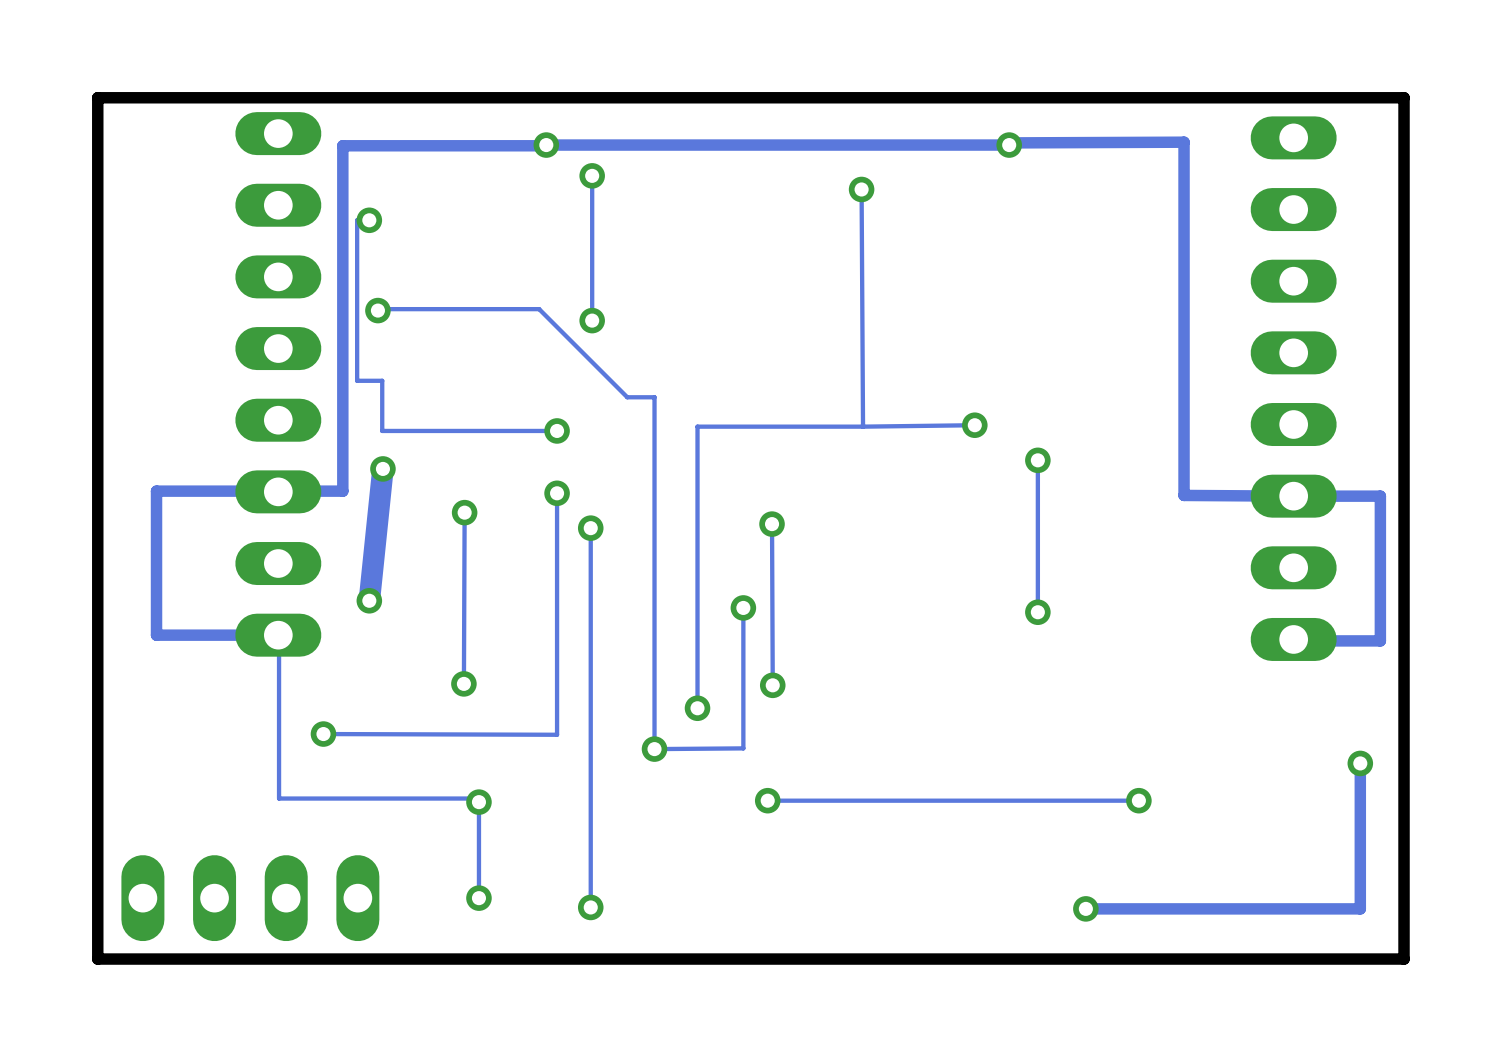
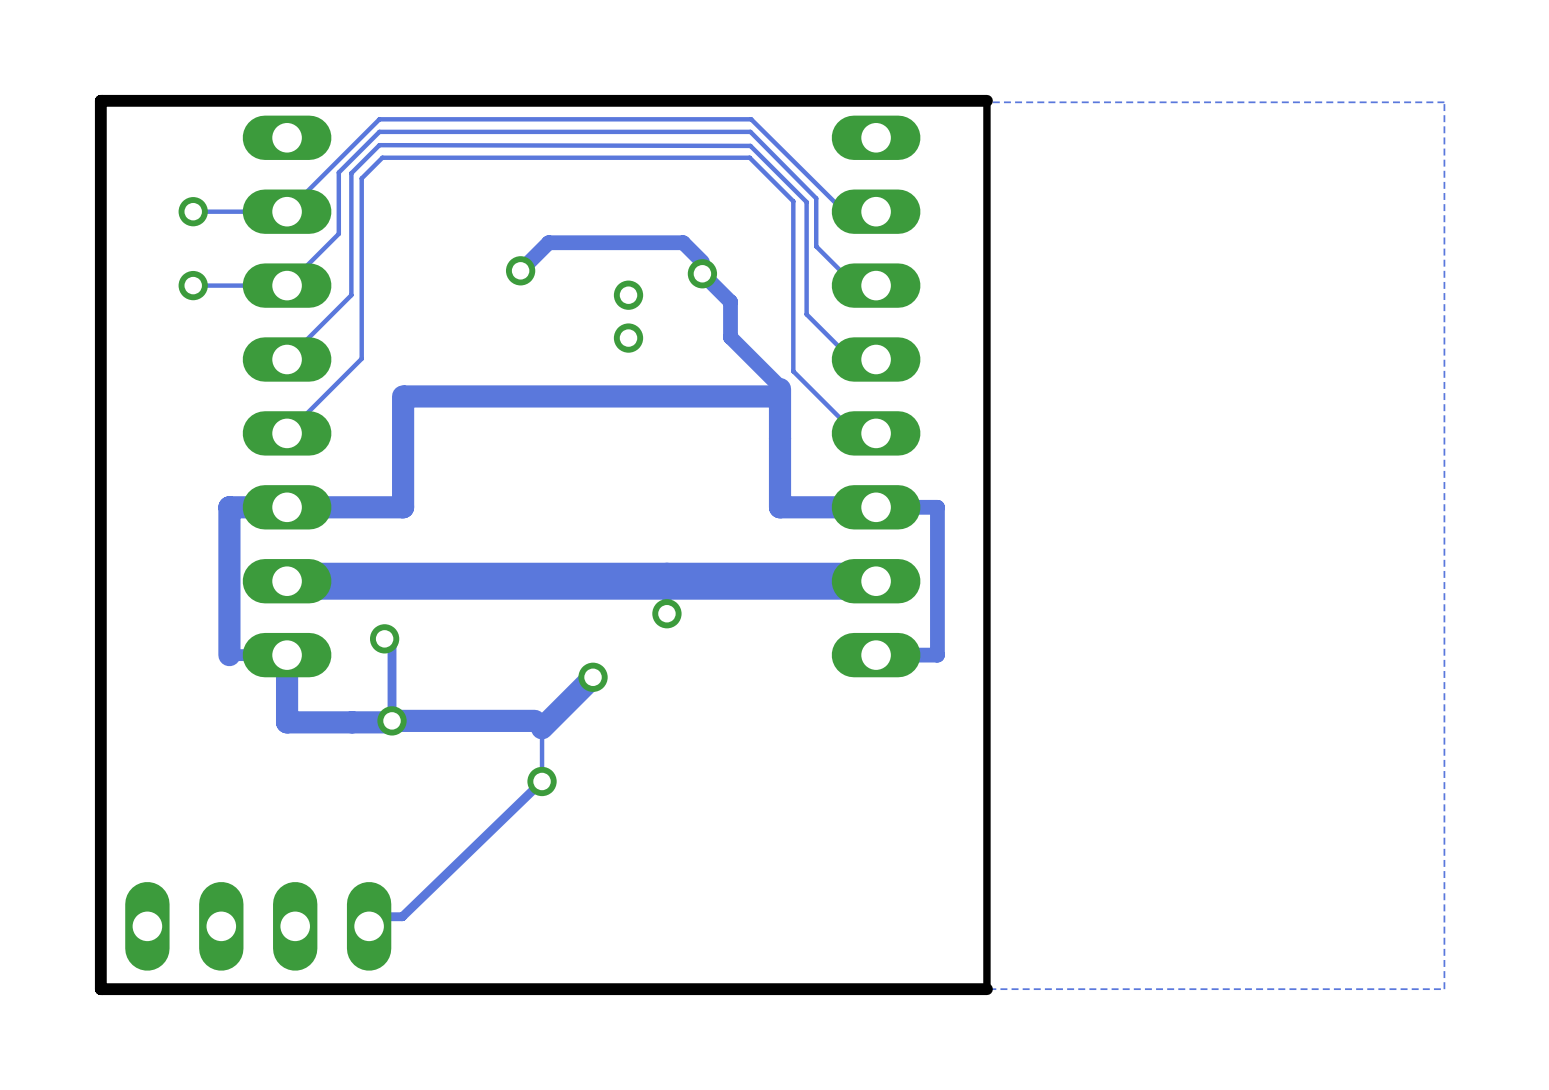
board edge: (956, 97) (1404, 97) (1404, 959) (956, 959) -> (986, 100) (986, 989)
via: (546, 145) -> none
via: (1009, 145) -> none
track: (592, 175) (592, 320) -> none
via: (592, 175) -> none
track: (861, 189) (863, 426) -> none
via: (861, 189) -> none
via: none -> (193, 211)
track: none -> (876, 211) (844, 211) (751, 119) (379, 119) (287, 211) (193, 211)
track: (369, 220) (357, 220) (357, 380) (382, 380) (382, 430) (557, 430) -> none
via: (369, 220) -> none
track: none -> (520, 270) (548, 242) (683, 242) (702, 261) (702, 273) (730, 301) (730, 337) (780, 386) (780, 389)
via: none -> (520, 270)
via: none -> (702, 273)
via: none -> (193, 285)
track: none -> (876, 285) (854, 284) (816, 246) (816, 198) (750, 131) (379, 131) (338, 172) (338, 233) (287, 285) (193, 285)
via: none -> (628, 295)
track: (377, 310) (539, 309) (627, 397) (654, 397) (654, 749) (743, 748) (743, 607) -> none
via: (377, 310) -> none
via position: (592, 320) -> (628, 338)
track: none -> (876, 359) (850, 358) (806, 314) (806, 202) (750, 145) (379, 145) (351, 173) (351, 295) (287, 359)
track: none -> (780, 389) (772, 396) (403, 396) (403, 507)
track: none -> (780, 389) (780, 507) (847, 507)
part position: (1293, 388) -> (876, 396)
track: none -> (876, 433) (854, 432) (793, 371) (793, 201) (749, 157) (382, 157) (361, 178) (361, 358) (287, 433)
track: (974, 425) (863, 426) -> none
via: (974, 425) -> none
track: (863, 426) (697, 426) (697, 708) -> none
via: (557, 430) -> none
track: (1037, 460) (1037, 612) -> none
via: (1037, 460) -> none
track: (382, 468) (369, 600) -> none
via: (382, 468) -> none
track: none -> (847, 506) (937, 507) (937, 655) (876, 655)
track: (557, 493) (557, 734) (323, 734) -> none
via: (557, 493) -> none
track: (464, 512) (463, 683) -> none
via: (464, 512) -> none
track: (772, 524) (772, 685) -> none
via: (772, 524) -> none
track: (590, 528) (590, 907) -> none
via: (590, 528) -> none
track: none -> (876, 581) (287, 581)
via: none -> (666, 613)
via position: (369, 600) -> (384, 638)
via: (743, 607) -> none
via: (1037, 612) -> none
track: none -> (384, 638) (392, 646) (392, 720)
track: (222, 635) (156, 635) (156, 491) (342, 491) (342, 145) (1009, 145) (1009, 142) (1184, 142) (1184, 495) (1380, 496) (1380, 640) (1293, 639) -> (229, 655) (229, 507) (403, 507)
track: (278, 635) (279, 798) (478, 798) (478, 898) -> none
track: none -> (287, 657) (287, 655) (287, 722) (392, 720)
track: none -> (593, 677) (542, 728)
via: none -> (593, 677)
via: (463, 683) -> none
via: (772, 685) -> none
track: none -> (392, 720) (534, 720) (542, 728)
via: none -> (392, 720)
track: none -> (542, 728) (542, 781) (402, 916) (369, 916)
via: (697, 708) -> none
via: (323, 734) -> none
via: (654, 749) -> none
via: none -> (542, 781)
track: (1360, 763) (1360, 908) (1085, 908) -> none
via: (1360, 763) -> none
via: (767, 800) -> none
track: (1138, 800) (767, 800) -> none
via: (1138, 800) -> none
via: (478, 802) -> none
via: (478, 898) -> none
via: (590, 907) -> none
via: (1085, 908) -> none

